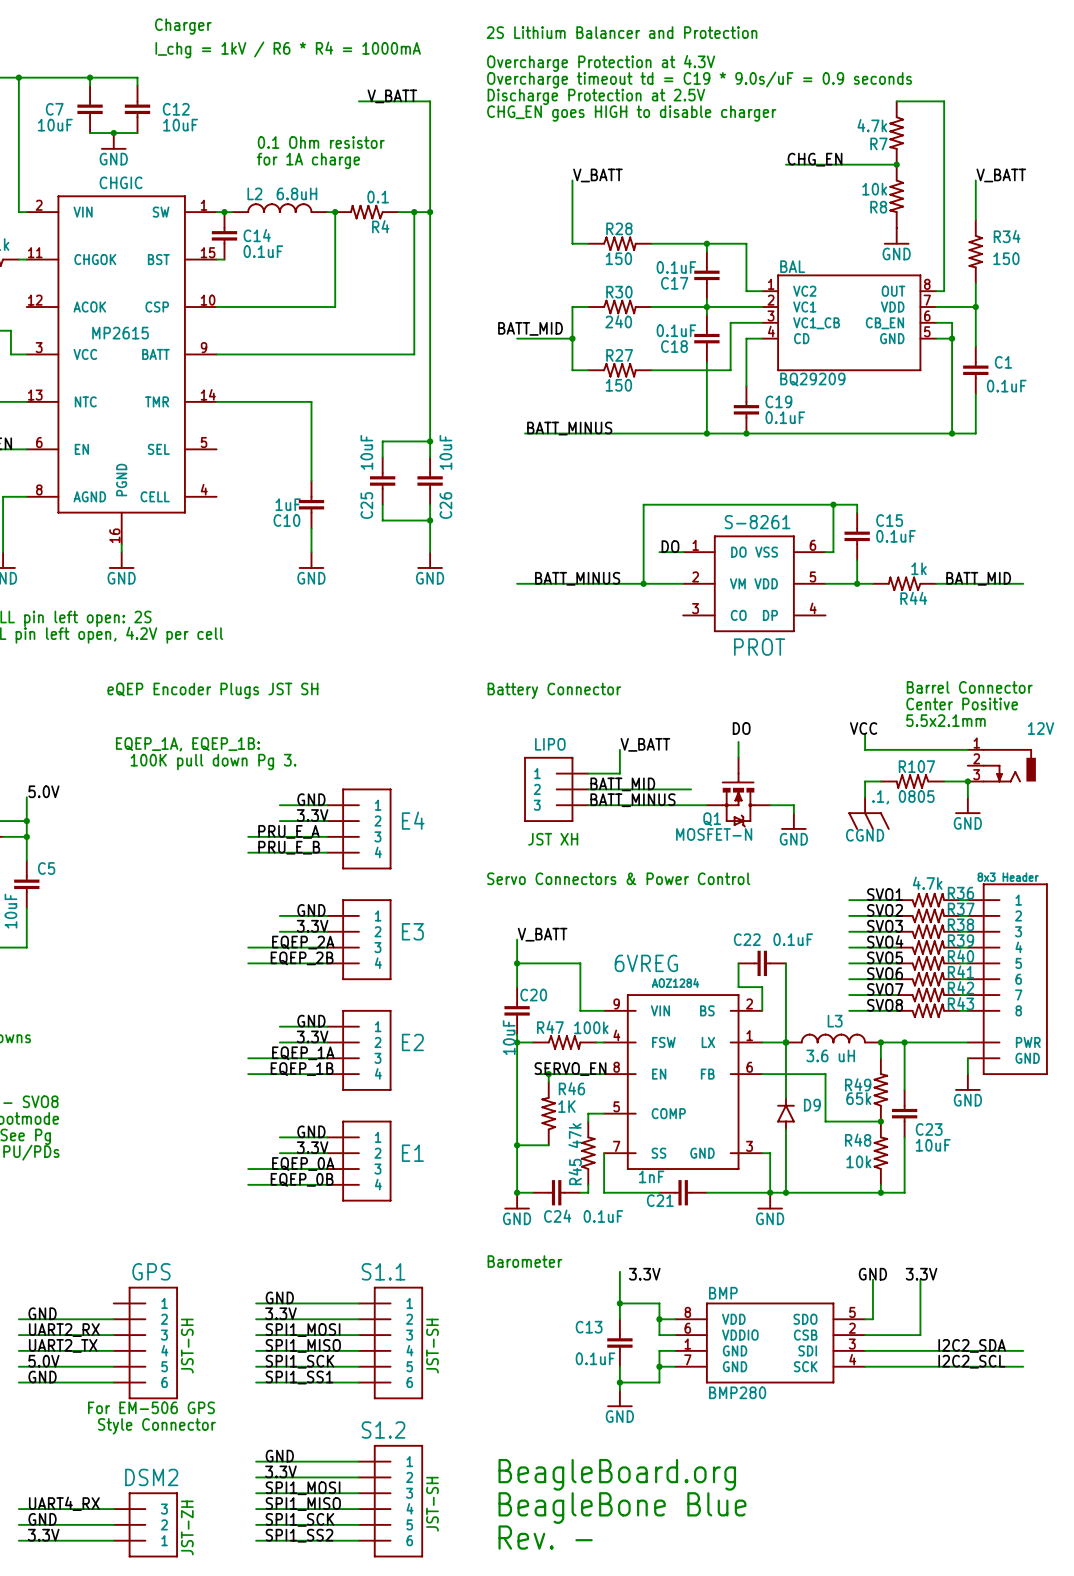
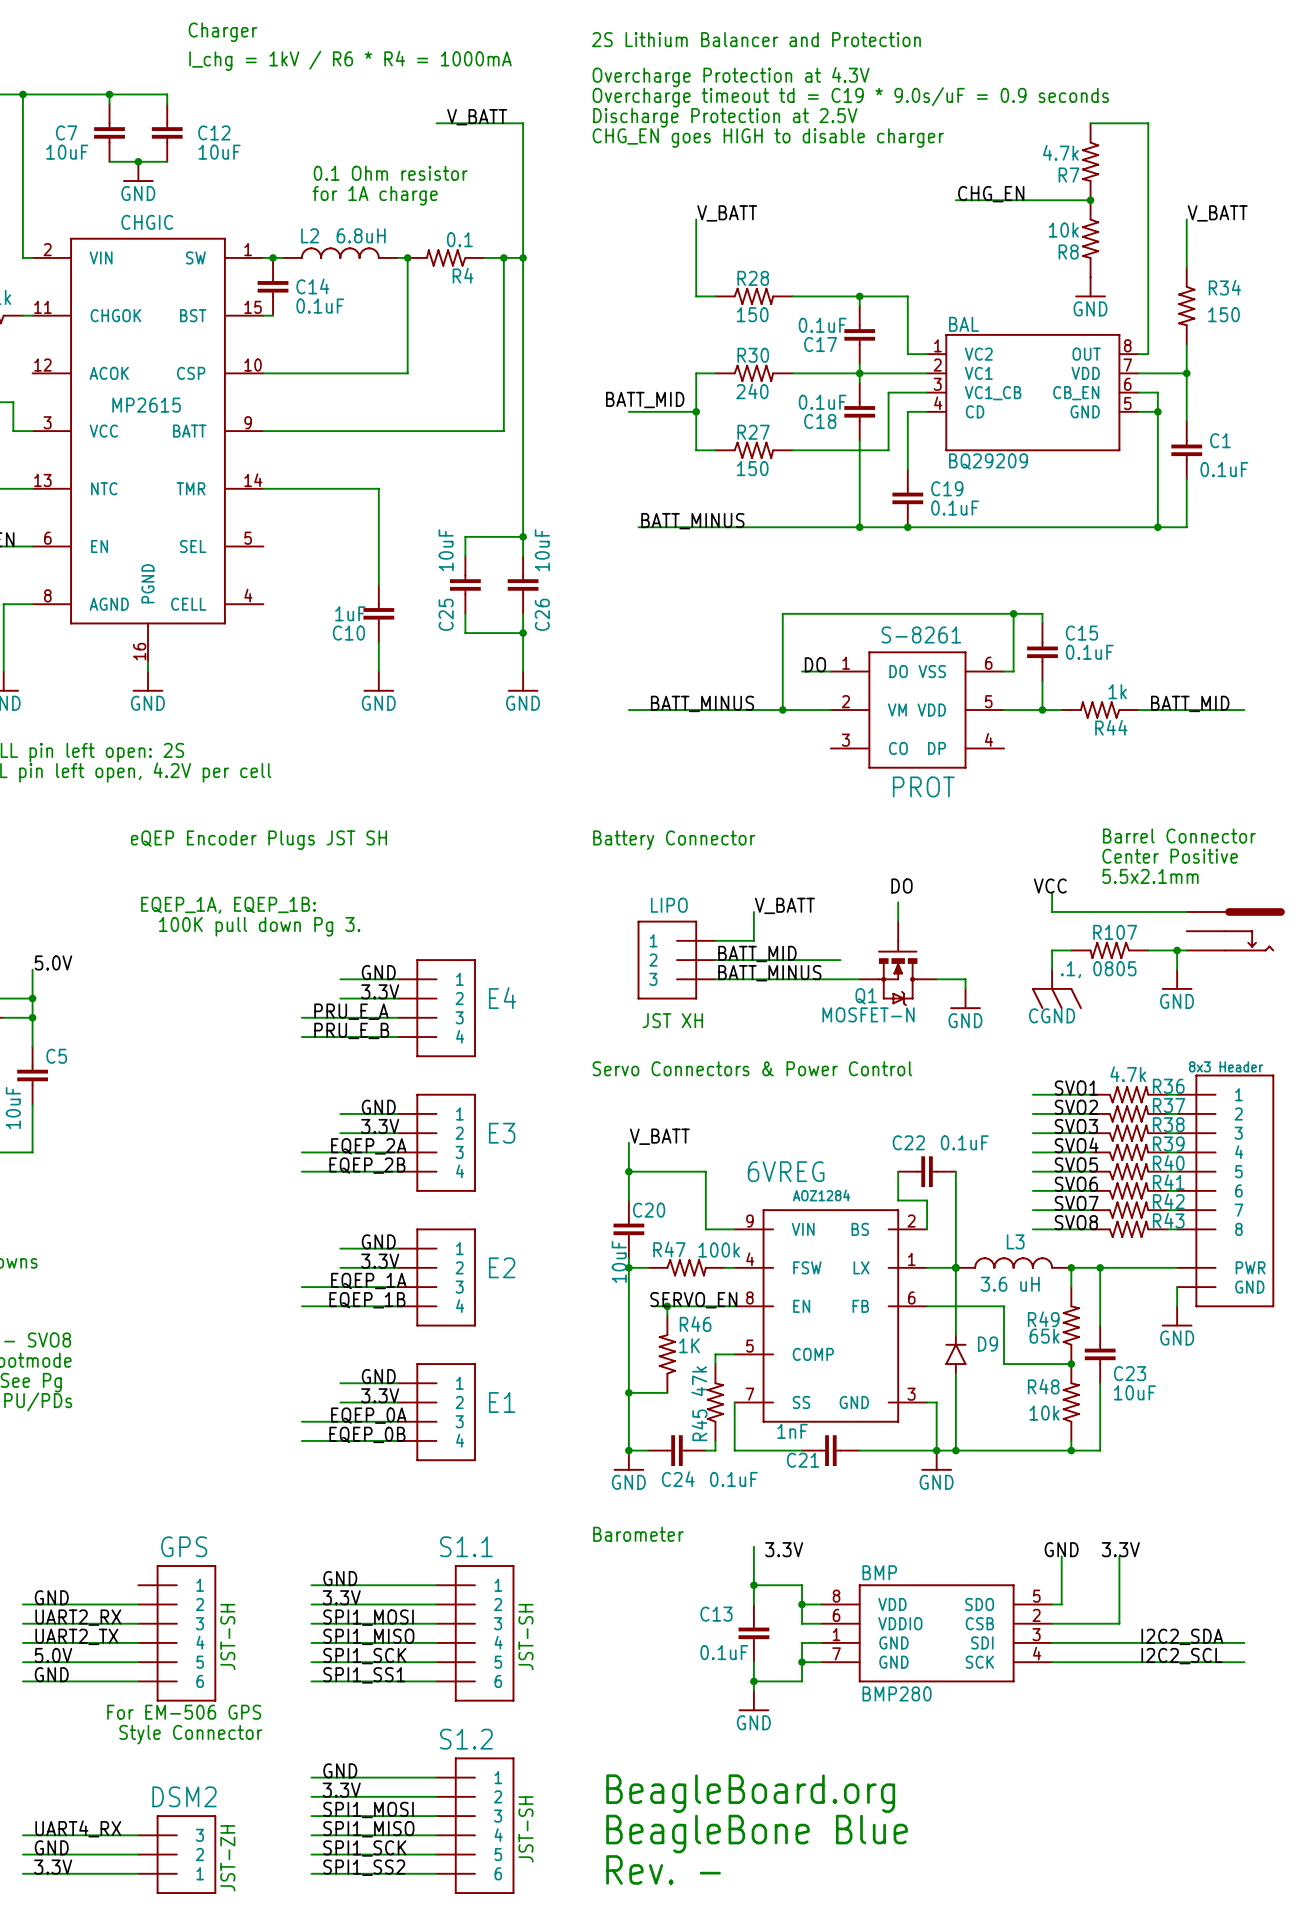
part: none -> (1235, 929)
12V: (1001, 765) -> none

